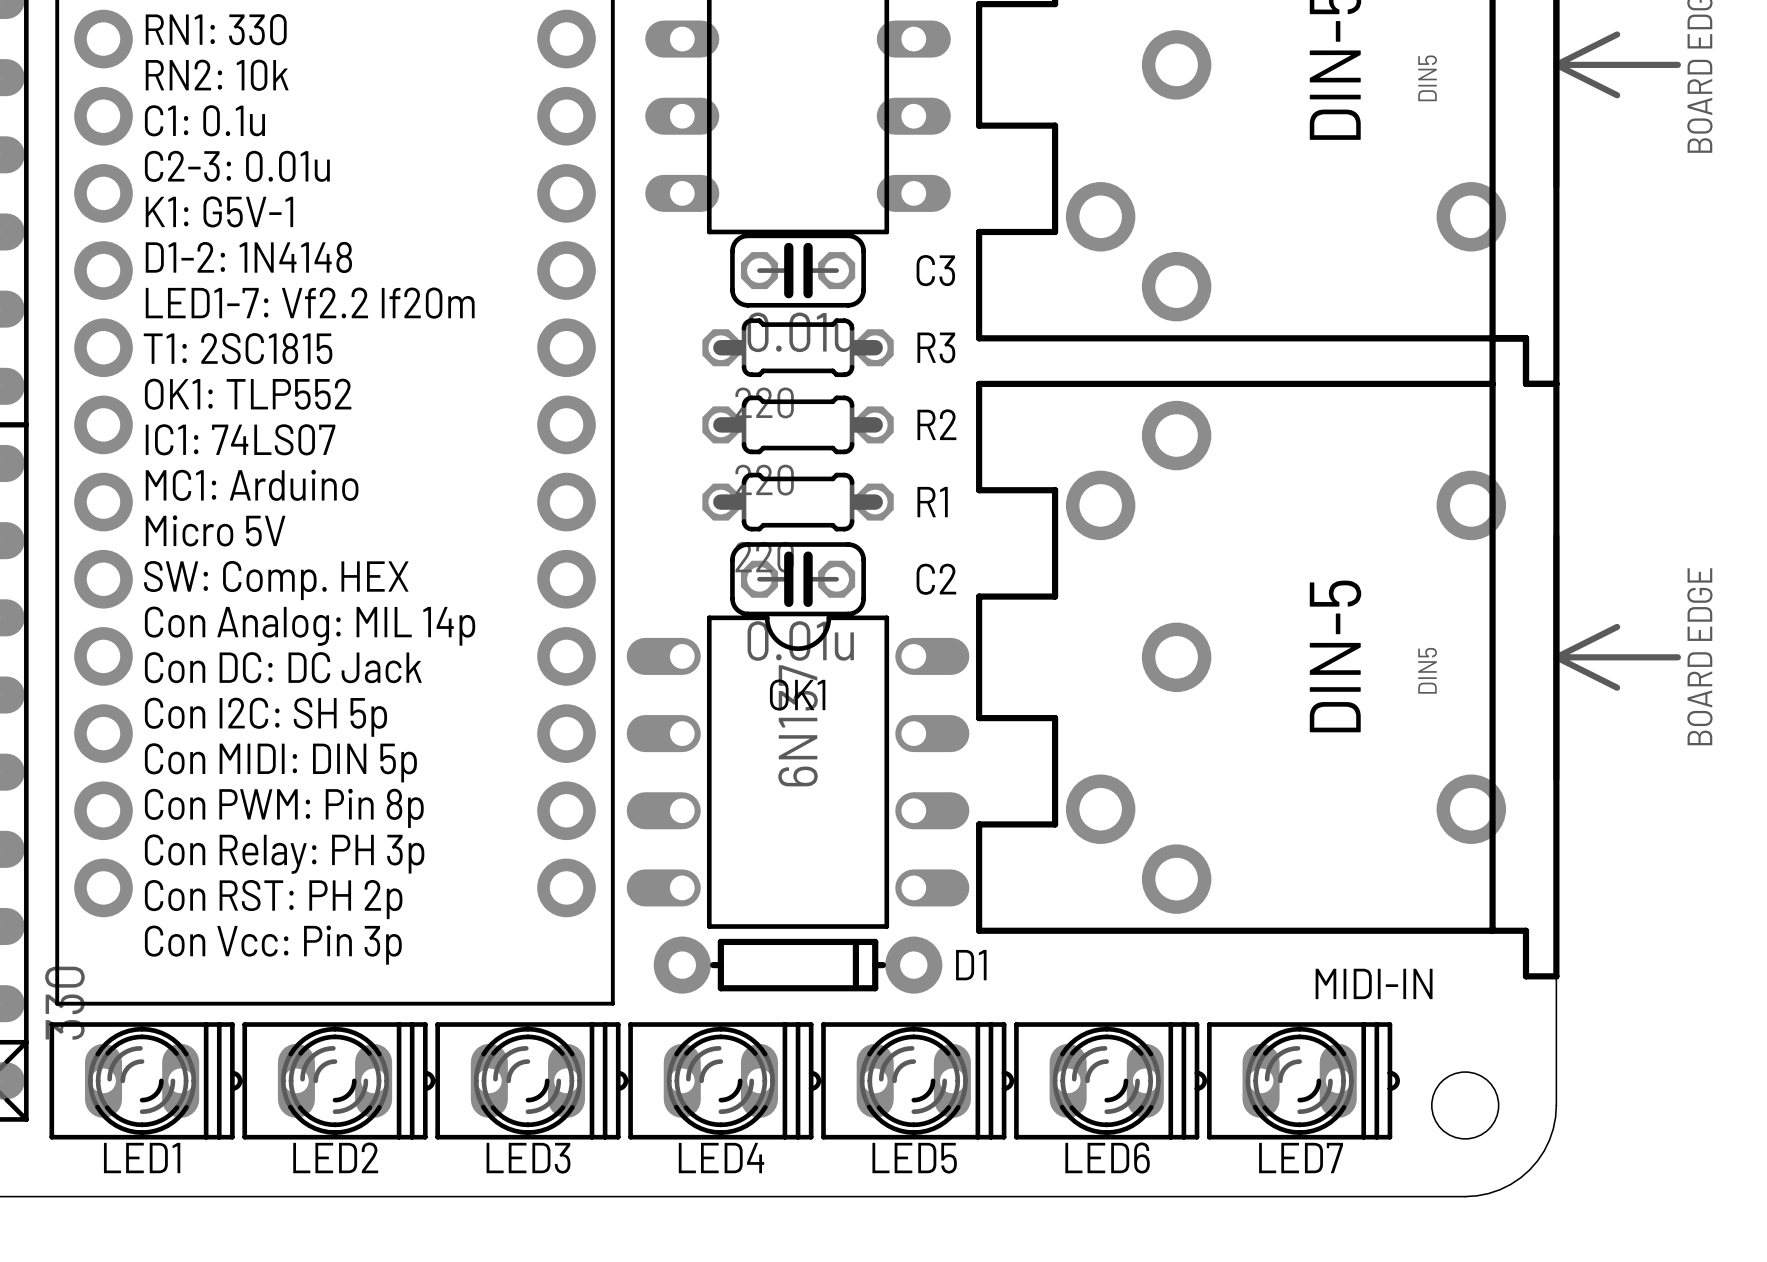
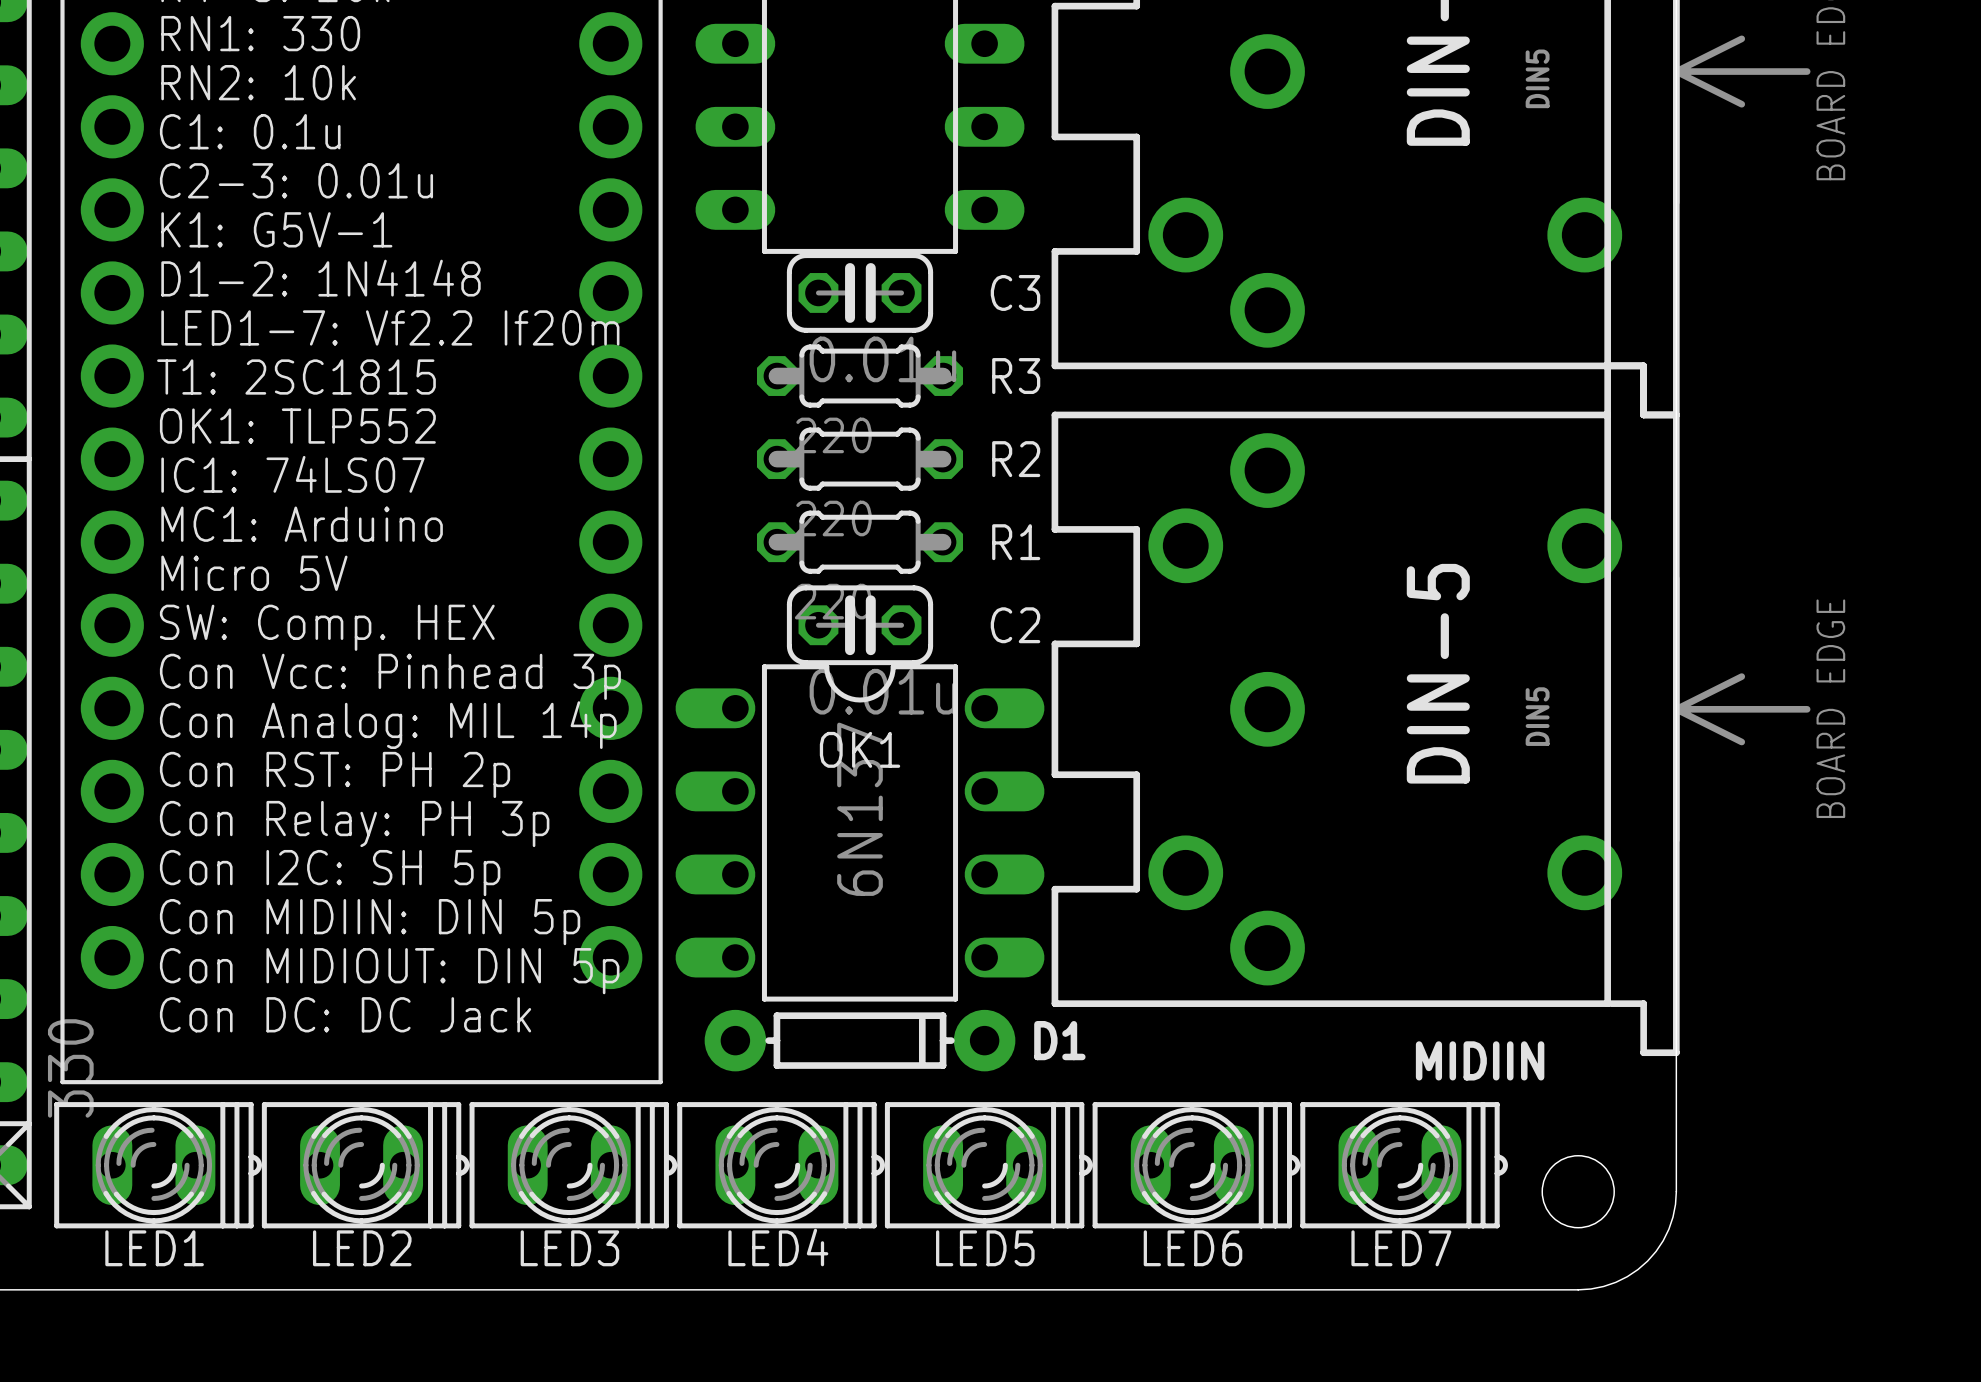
text: Con Analog: MIL 14p (310, 626) -> Con Vcc: Pinhead 3p (390, 676)
text: Con DC: DC Jack (283, 667) -> Con Analog: MIL 14p (388, 725)
text: Con I2C: SH 5p (265, 717) -> Con RST: PH 2p (335, 774)
text: Con MIDI: DIN 5p (280, 762) -> Con Relay: PH 3p (354, 823)
text: Con PWM: Pin 8p (284, 808) -> Con I2C: SH 5p (330, 873)
text: Con Relay: PH 3p (284, 854) -> Con MIDIIN: DIN 5p (370, 922)
text: Con RST: PH 2p (273, 899) -> Con MIDIOUT: DIN 5p (389, 971)
text: Con Vcc: Pin 3p (273, 945) -> Con DC: DC Jack (345, 1014)
MIDI-IN name: MIDI-IN (1374, 983) -> MIDIIN (1480, 1060)

